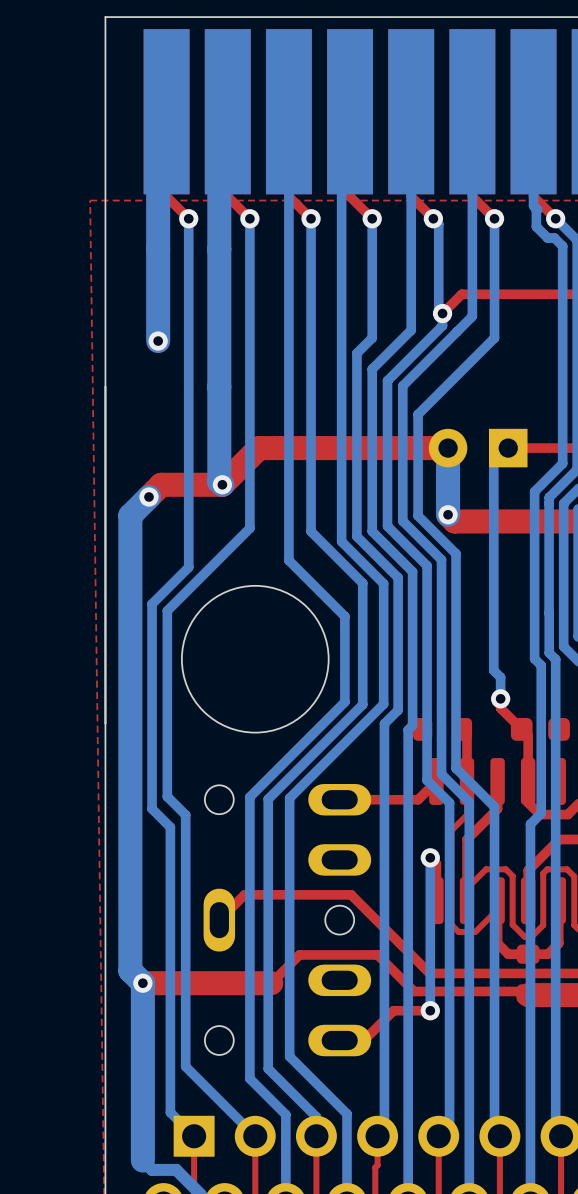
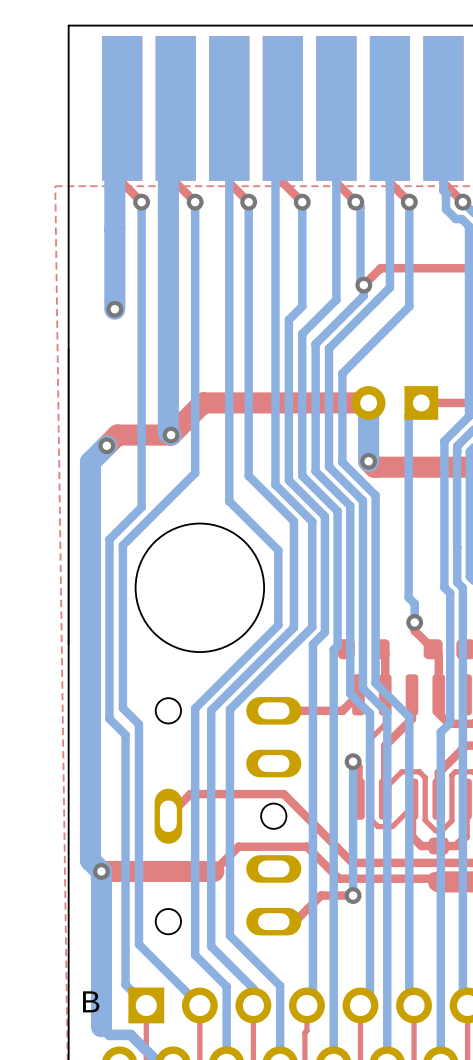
text: none -> B (91, 1001)

